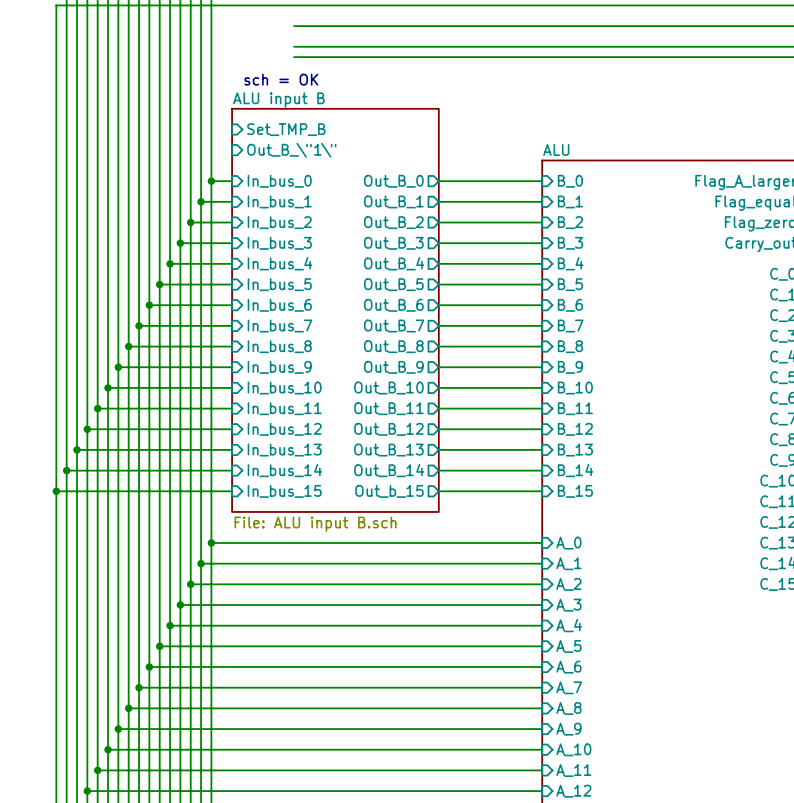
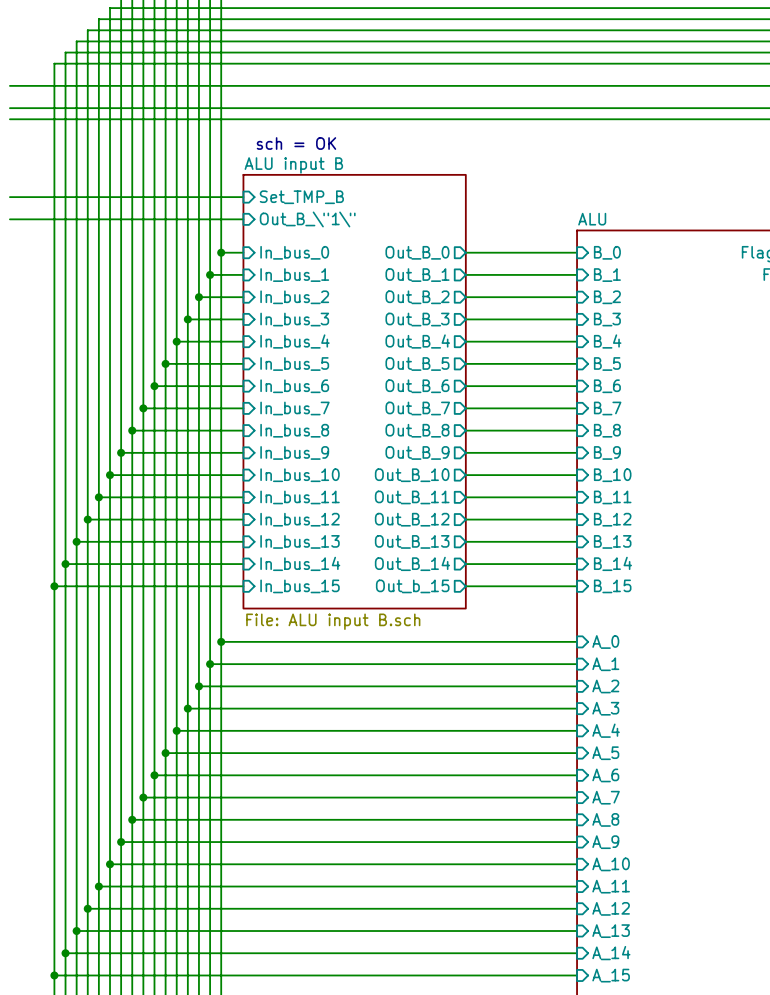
wire: none -> (9, 85) (310, 85)
wire: none -> (9, 108) (310, 108)
wire: none -> (9, 119) (310, 119)
wire: none -> (9, 197) (243, 197)
wire: none -> (9, 219) (243, 219)

